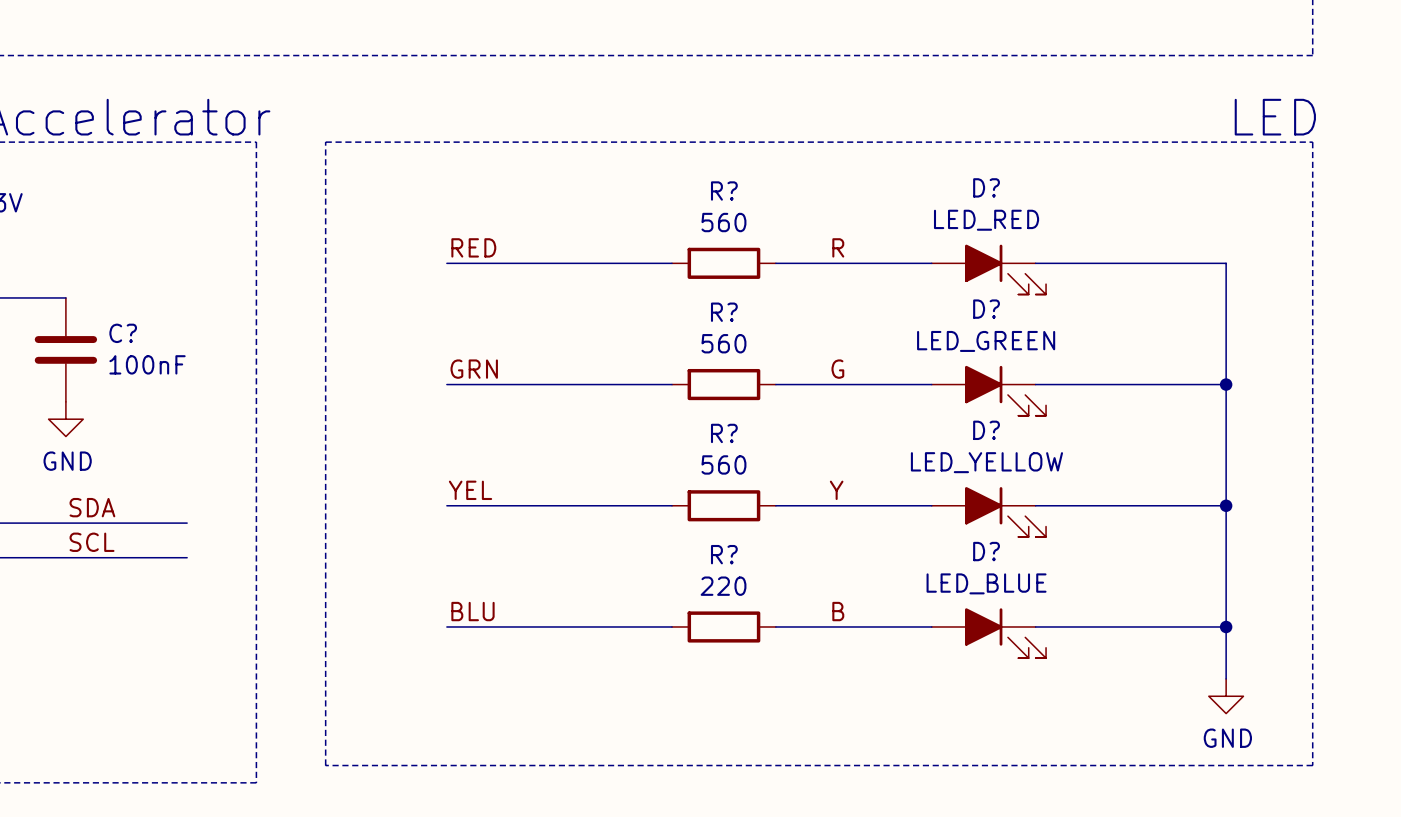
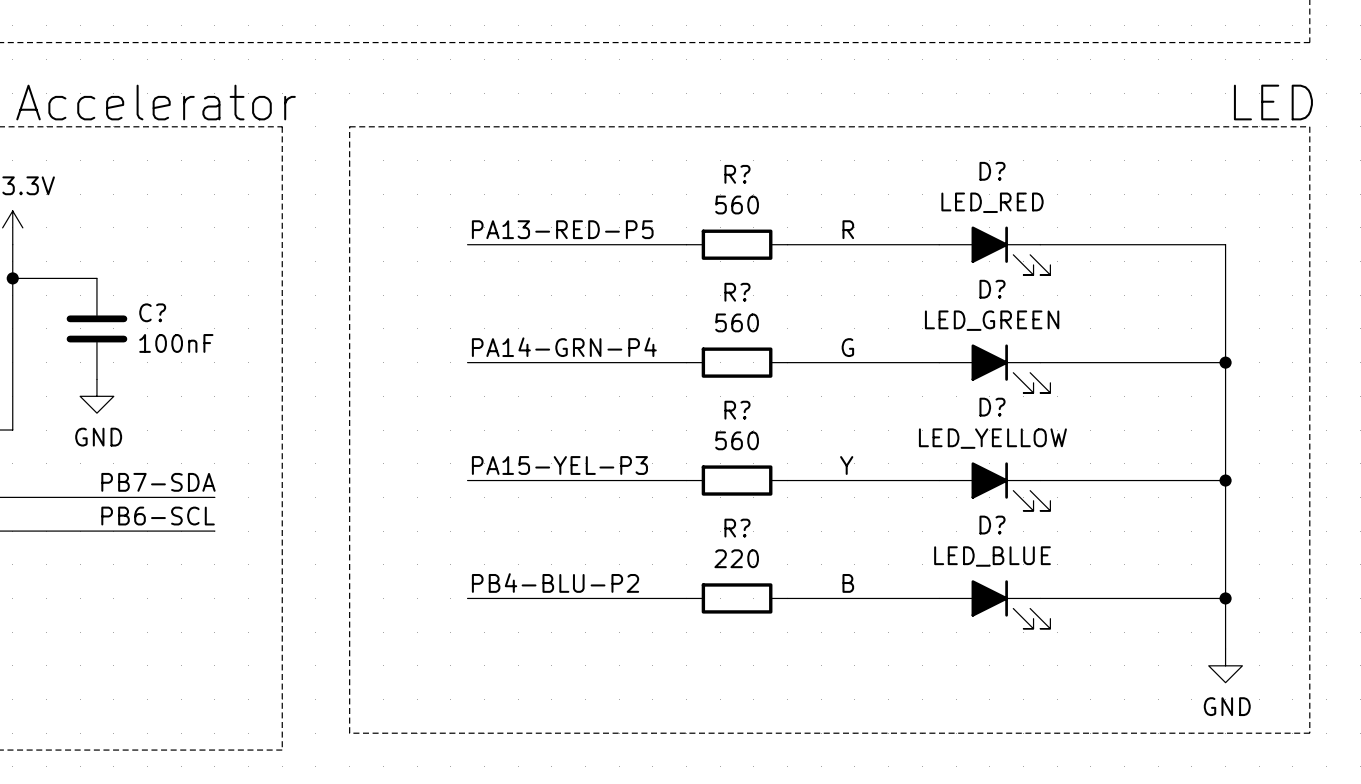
label: RED (473, 247) -> PA13-RED-P5 (562, 229)
label: GRN (474, 369) -> PA14-GRN-P4 (564, 347)
label: YEL (470, 490) -> PA15-YEL-P3 (559, 465)
label: SDA (92, 507) -> PB7-SDA (158, 482)
label: SCL (92, 542) -> PB6-SCL (158, 516)
label: BLU (472, 611) -> PB4-BLU-P2 (555, 583)

